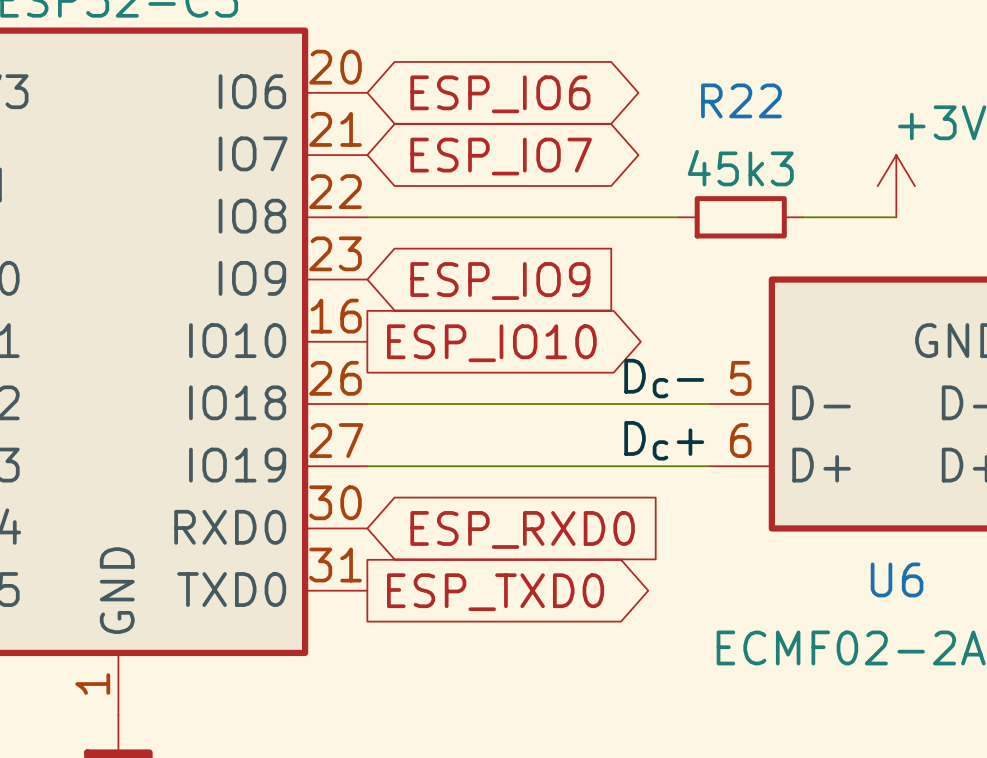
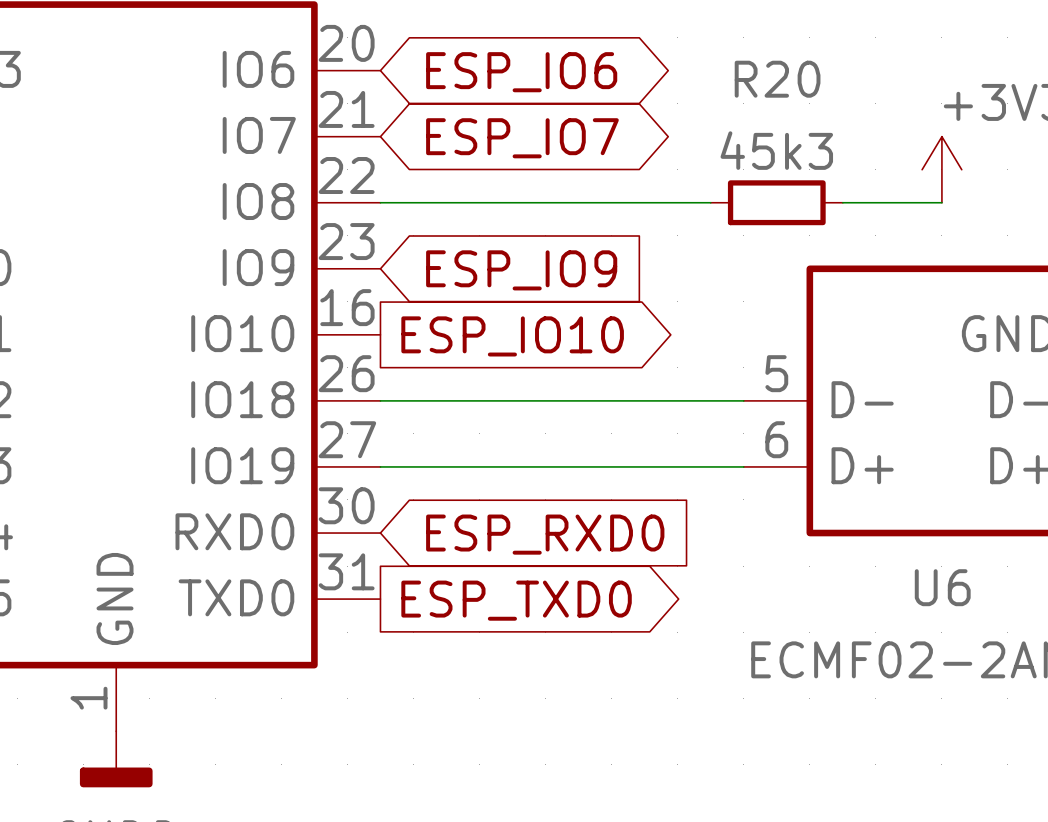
R22 name: R22 (741, 100) -> R20 (777, 79)
label: Dc- (664, 378) -> none
label: Dc+ (664, 440) -> none

